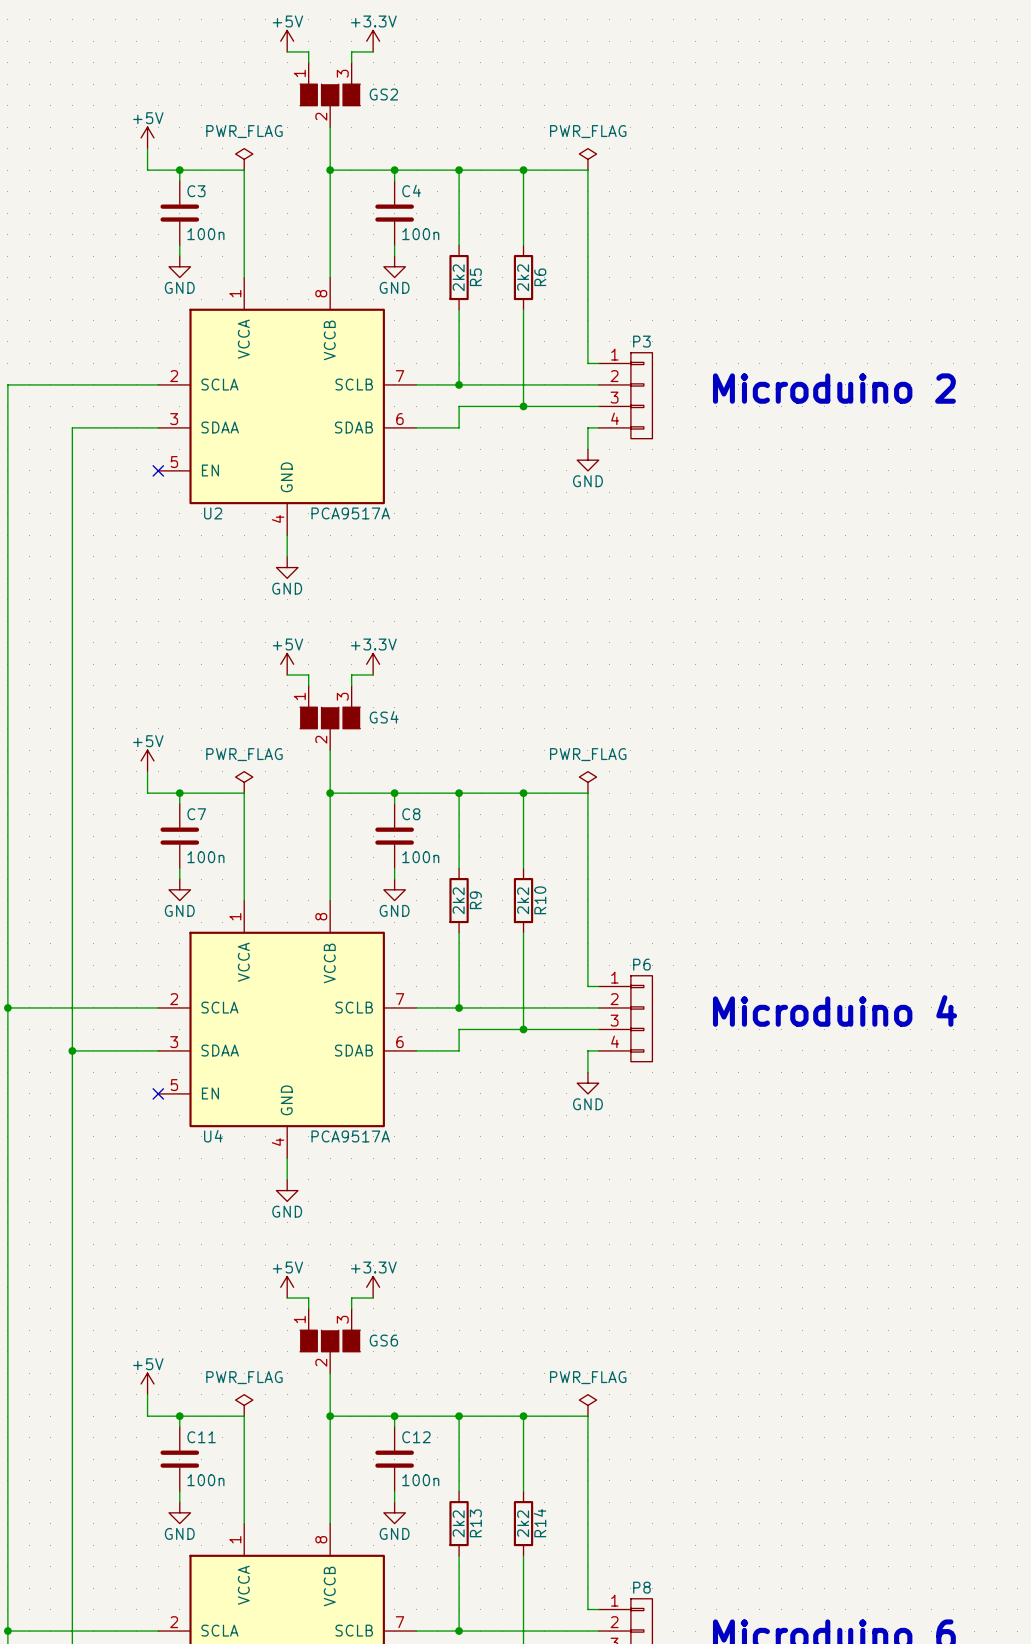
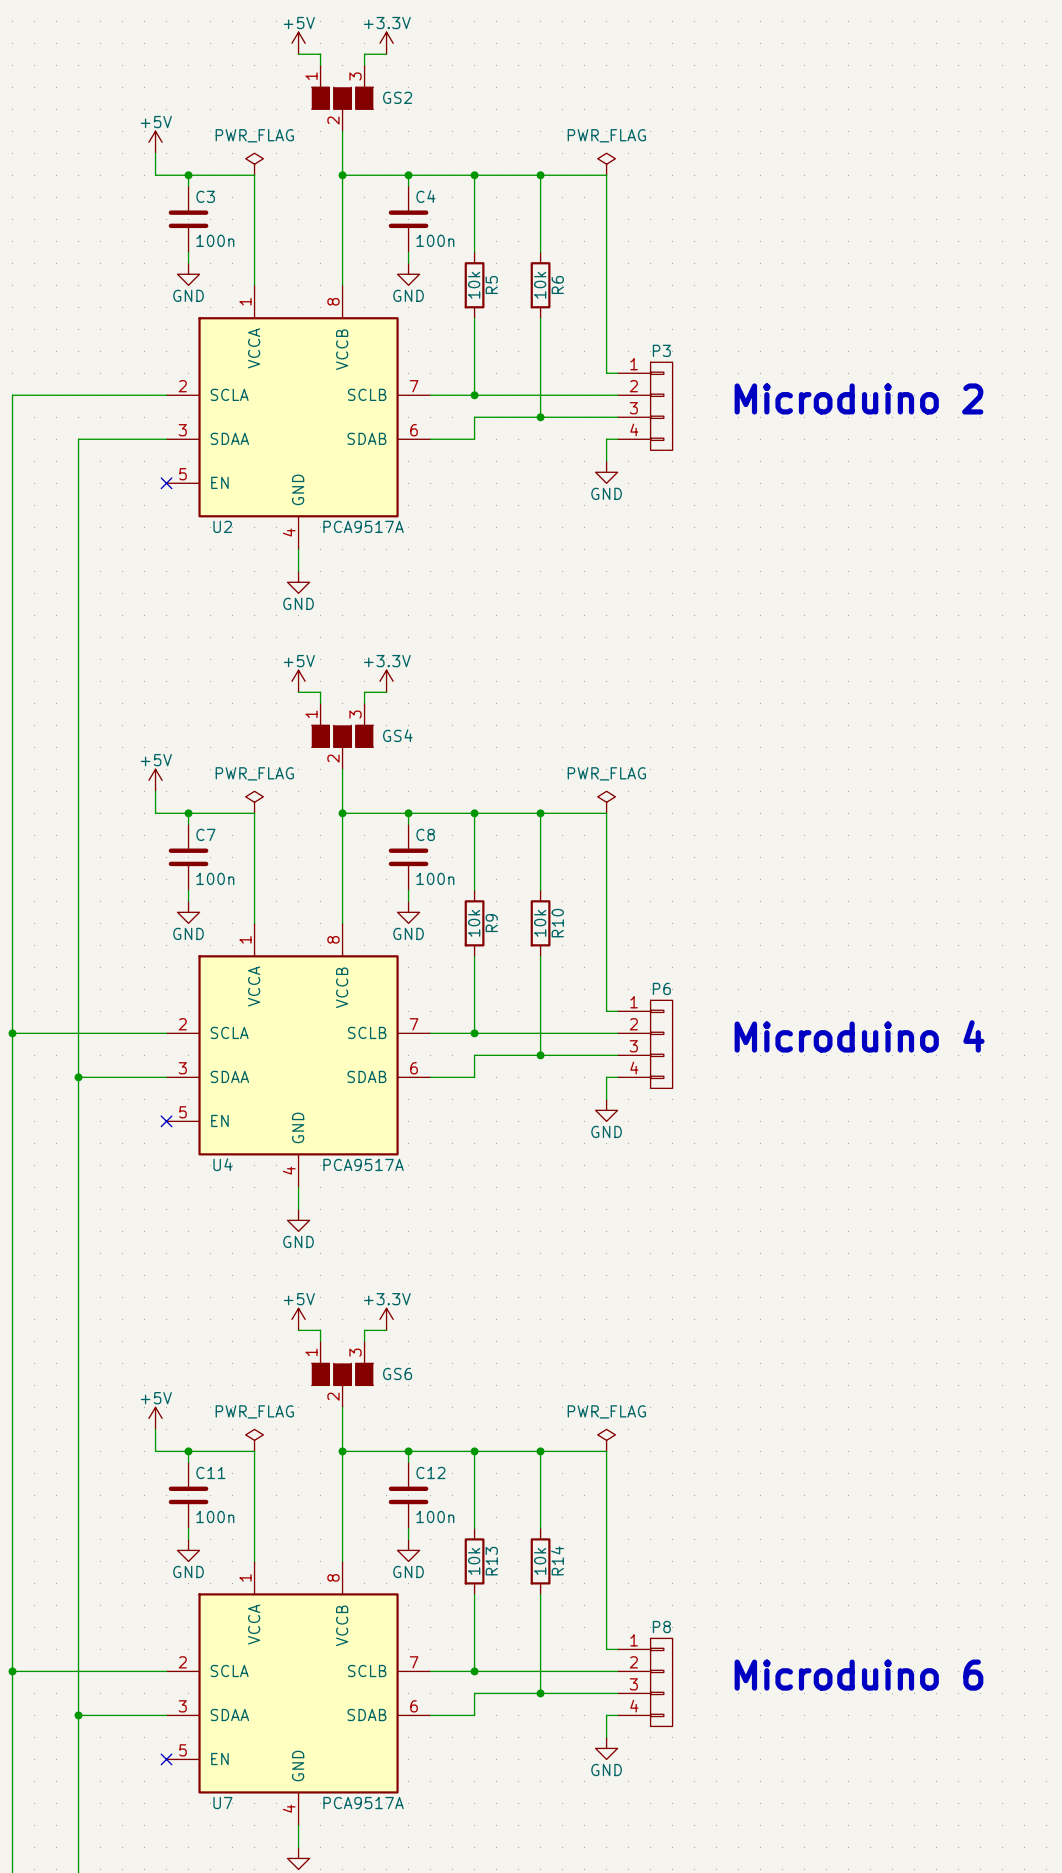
R5 value: 2k2 (458, 277) -> 10k (474, 285)
R6 value: 2k2 (523, 277) -> 10k (540, 285)
R9 value: 2k2 (458, 900) -> 10k (474, 923)
R10 value: 2k2 (523, 900) -> 10k (540, 923)
R13 value: 2k2 (458, 1523) -> 10k (474, 1561)
R14 value: 2k2 (523, 1523) -> 10k (540, 1561)

